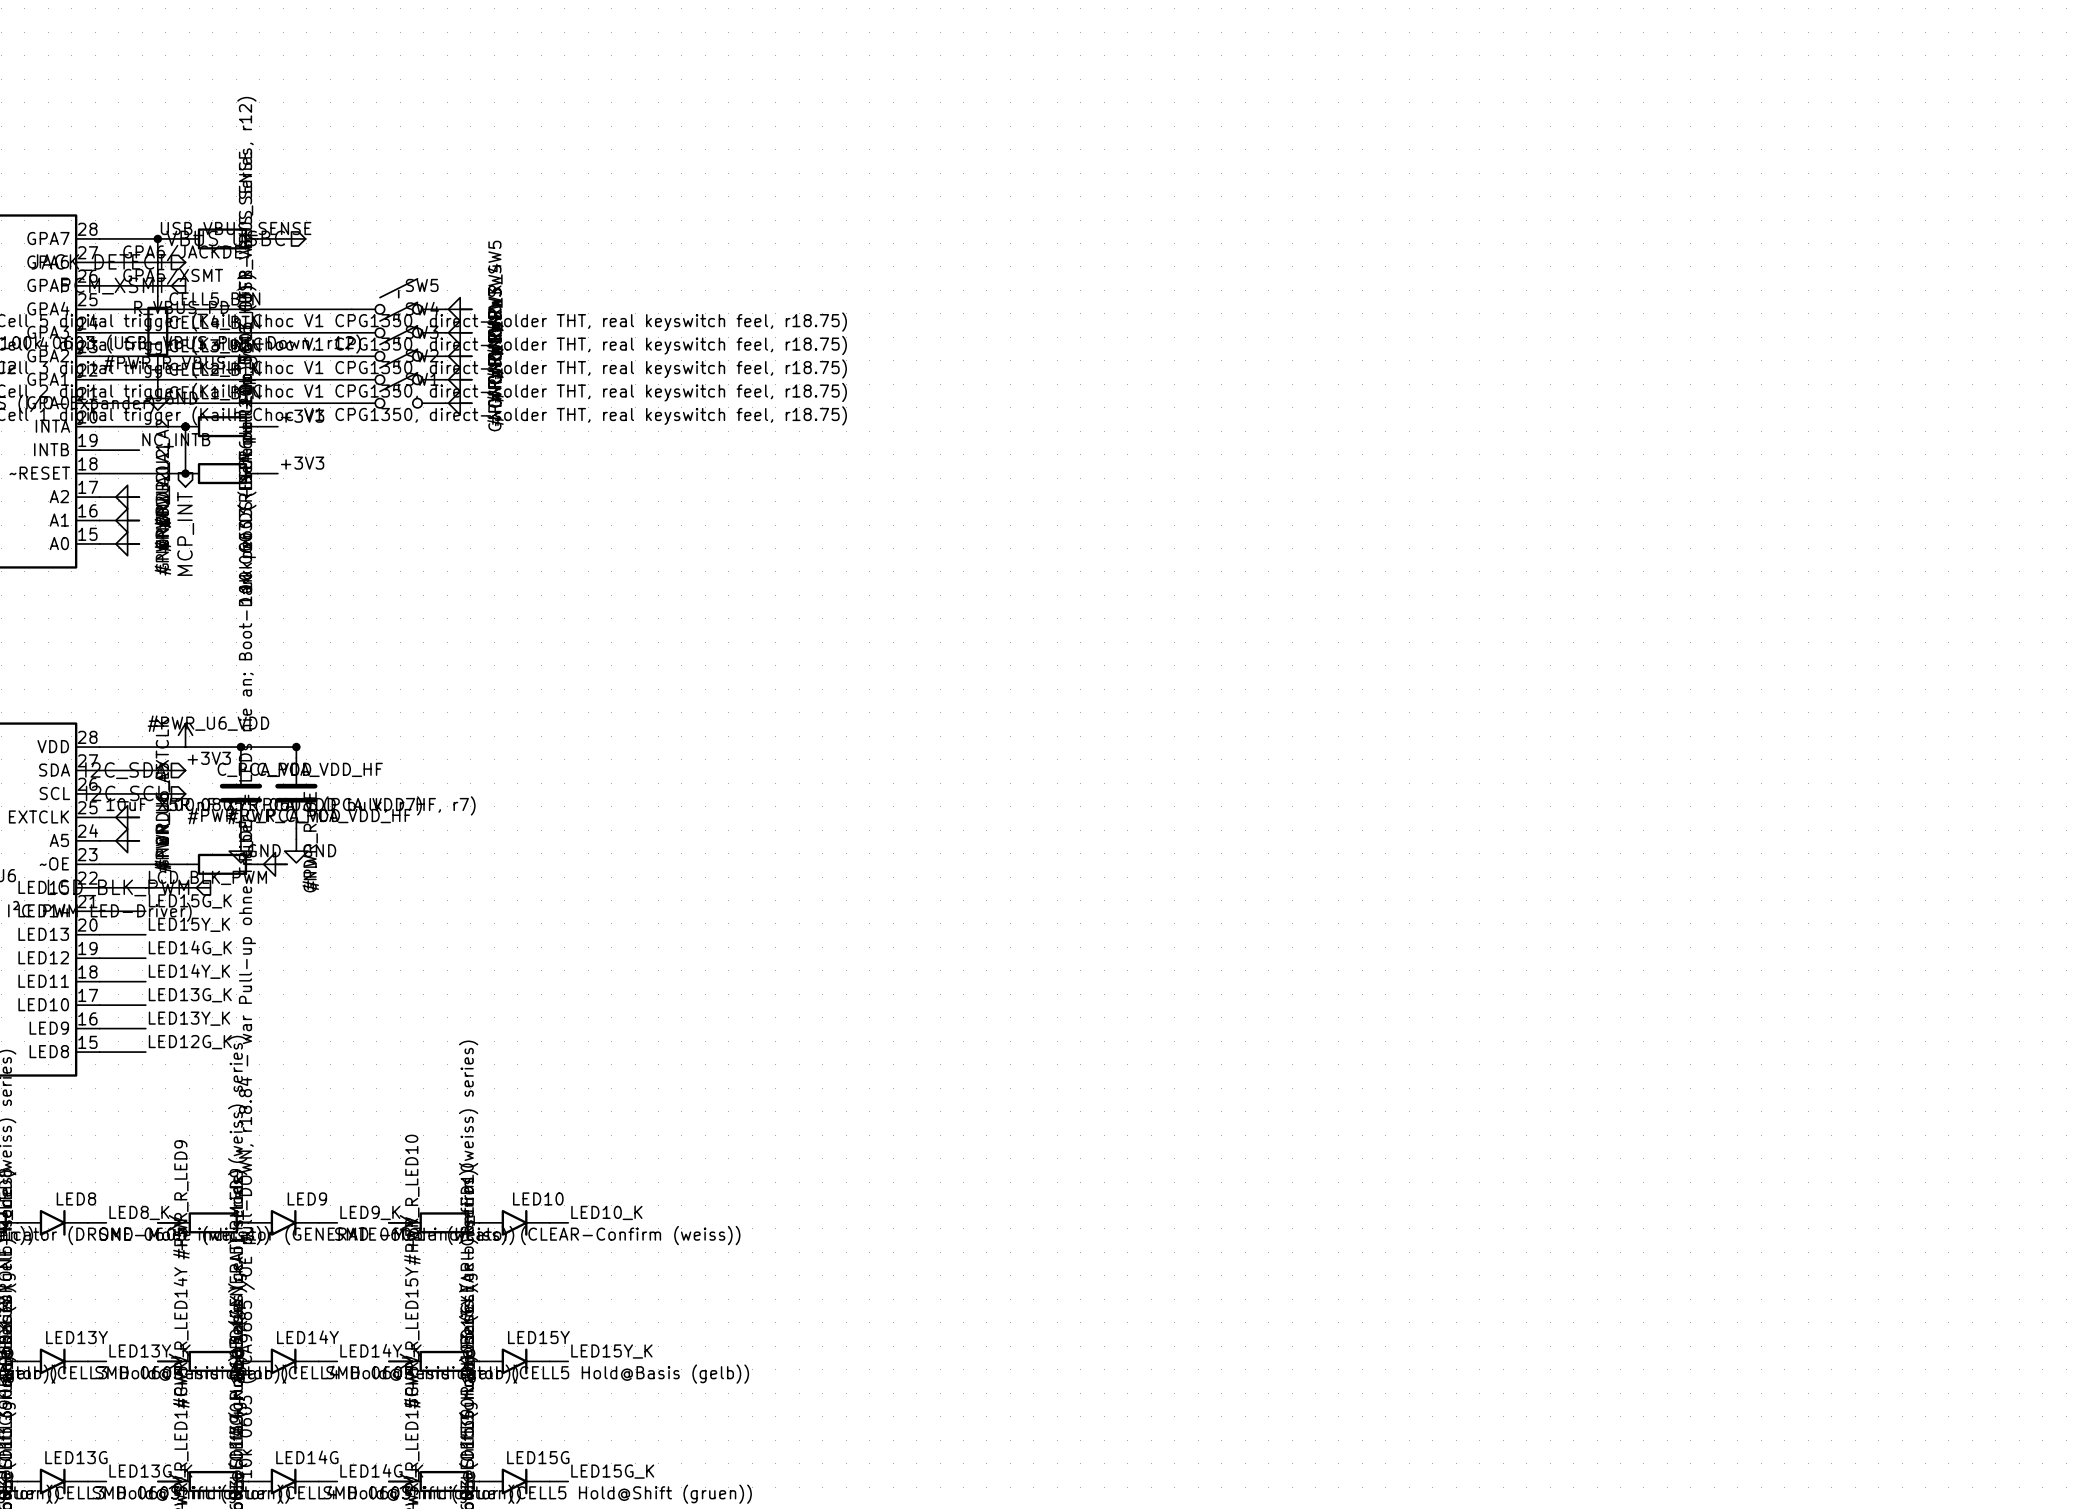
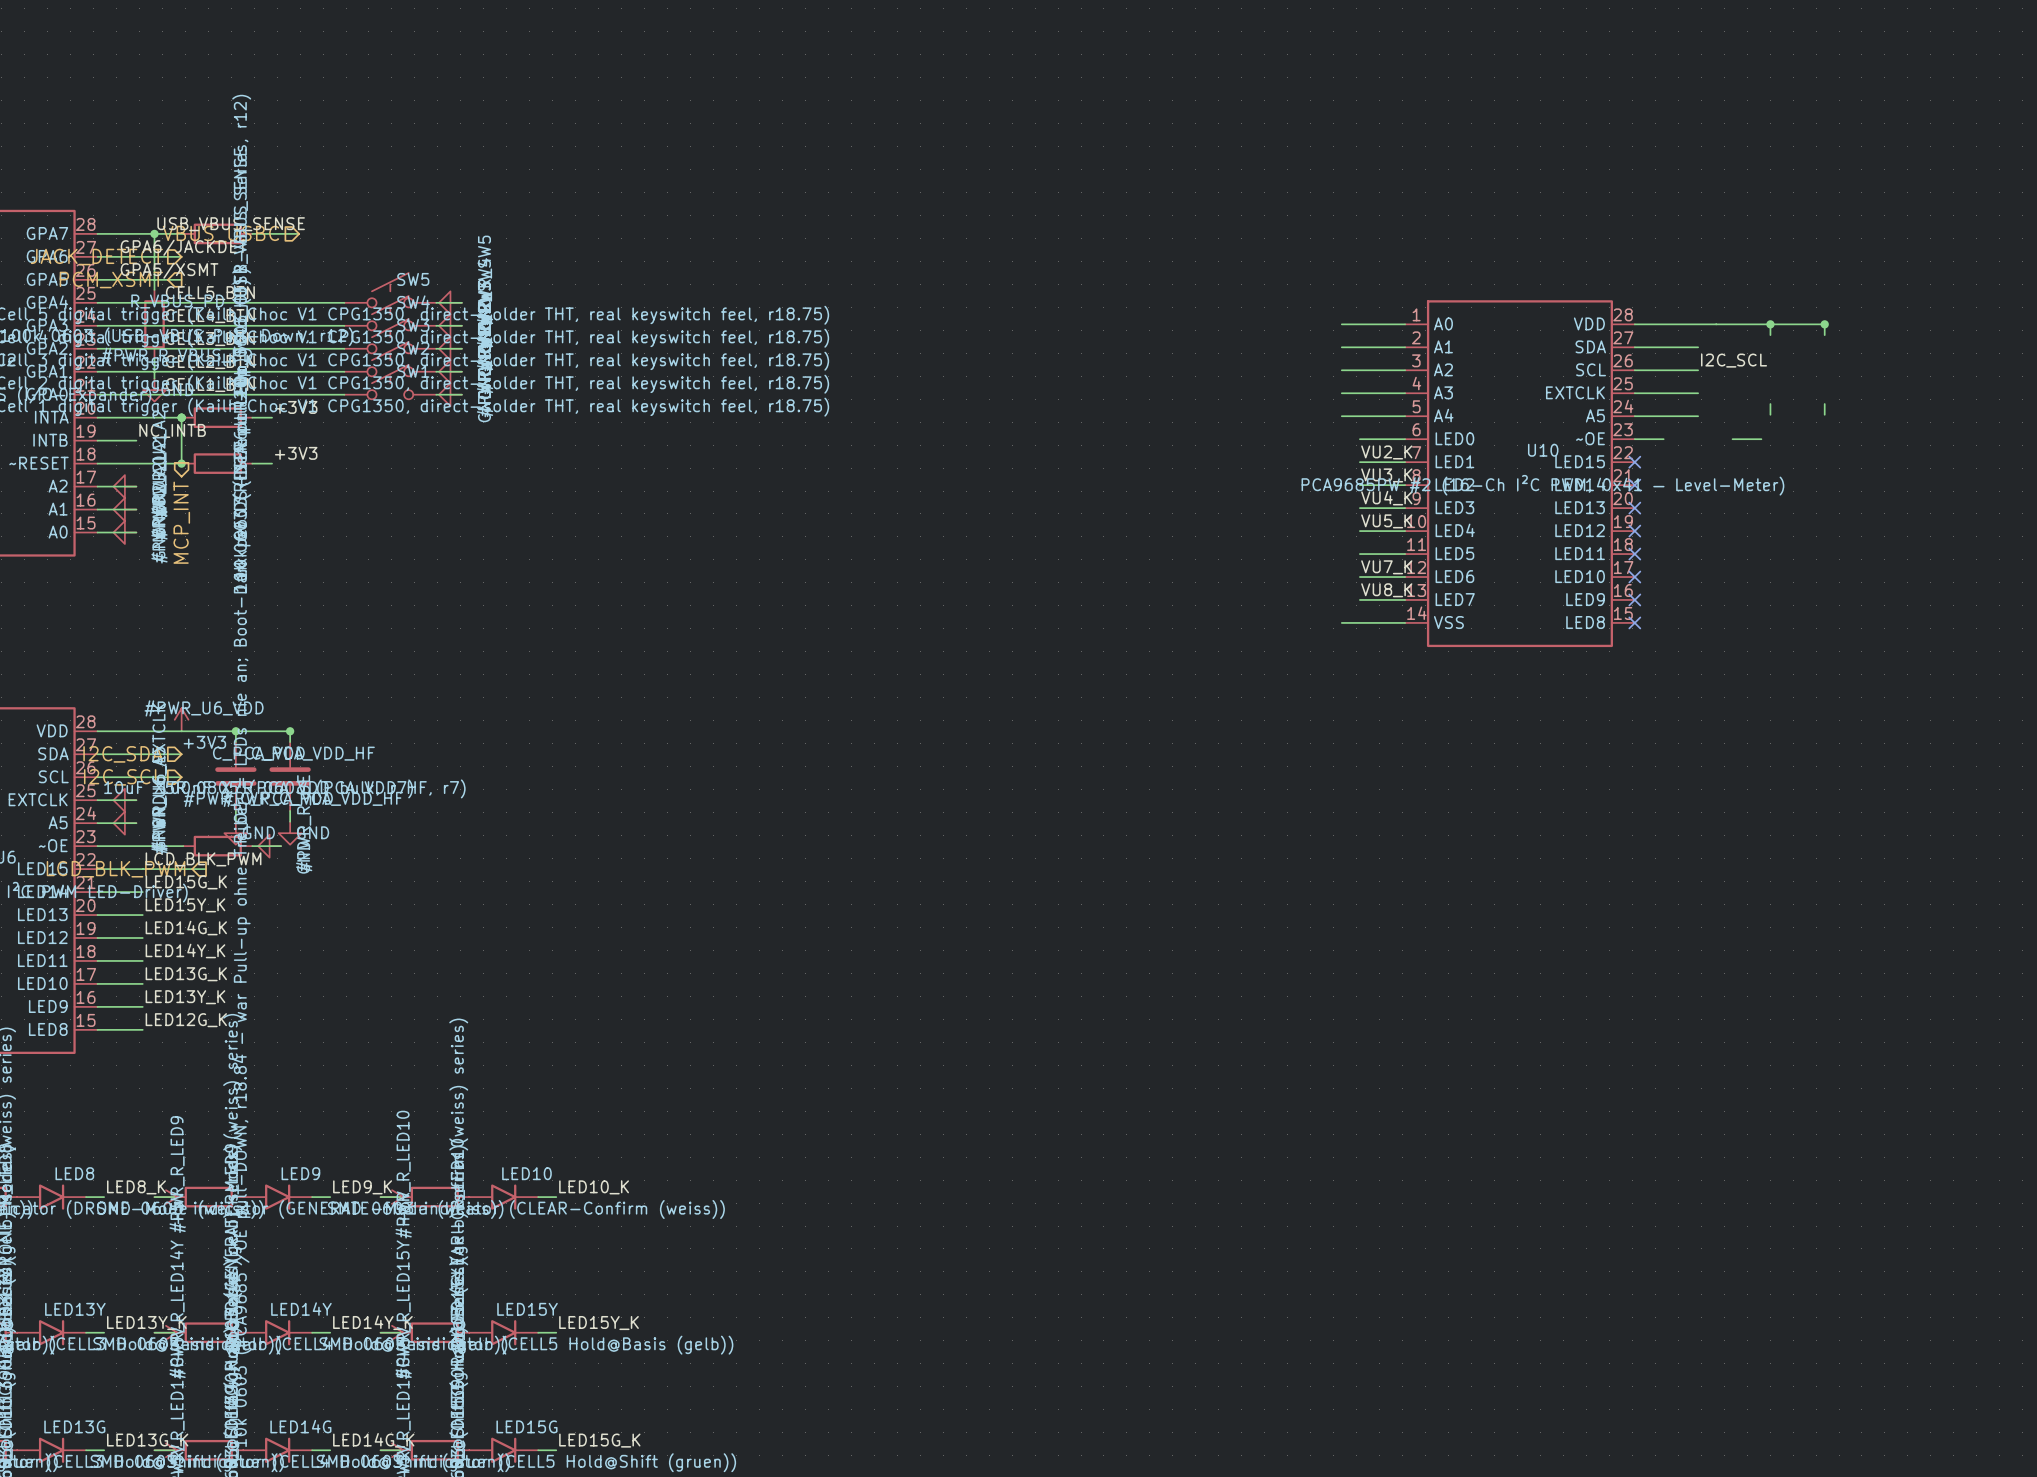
wire: none -> (1341, 324) (1405, 324)
wire: none -> (1634, 324) (1824, 324) (1824, 335)
wire: none -> (1770, 324) (1770, 335)
junction: none -> (1770, 324)
junction: none -> (1824, 324)
wire: none -> (1341, 347) (1405, 347)
wire: none -> (1634, 347) (1698, 347)
label: none -> I2C_SCL (1734, 360)
wire: none -> (1341, 370) (1405, 370)
wire: none -> (1634, 370) (1698, 370)
wire: none -> (1341, 393) (1405, 393)
wire: none -> (1634, 393) (1698, 393)
wire: none -> (1770, 404) (1770, 414)
wire: none -> (1824, 404) (1824, 414)
wire: none -> (1341, 416) (1405, 416)
wire: none -> (1634, 416) (1698, 416)
wire: none -> (1359, 439) (1405, 439)
wire: none -> (1634, 439) (1663, 439)
wire: none -> (1732, 439) (1761, 439)
label: none -> VU2_K (1386, 452)
wire: none -> (1359, 462) (1405, 462)
no-connect mark: none -> (1634, 462)
U10: none -> PCA9685PW #2 (16-Ch I²C PWM, 0x41 — Level-Meter) (1519, 473)
label: none -> VU3_K (1386, 475)
wire: none -> (1359, 485) (1405, 485)
no-connect mark: none -> (1634, 485)
label: none -> VU4_K (1386, 498)
wire: none -> (1359, 508) (1405, 508)
no-connect mark: none -> (1634, 508)
label: none -> VU5_K (1386, 521)
wire: none -> (1359, 531) (1405, 531)
no-connect mark: none -> (1634, 531)
wire: none -> (1359, 554) (1405, 554)
no-connect mark: none -> (1634, 554)
label: none -> VU7_K (1386, 567)
wire: none -> (1359, 577) (1405, 577)
no-connect mark: none -> (1634, 577)
label: none -> VU8_K (1386, 590)
wire: none -> (1359, 599) (1405, 599)
no-connect mark: none -> (1634, 599)
wire: none -> (1341, 622) (1405, 622)
no-connect mark: none -> (1634, 622)

